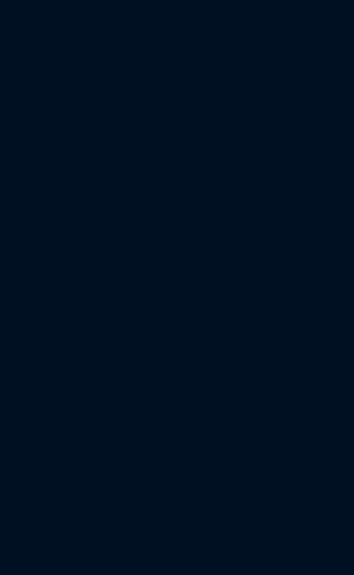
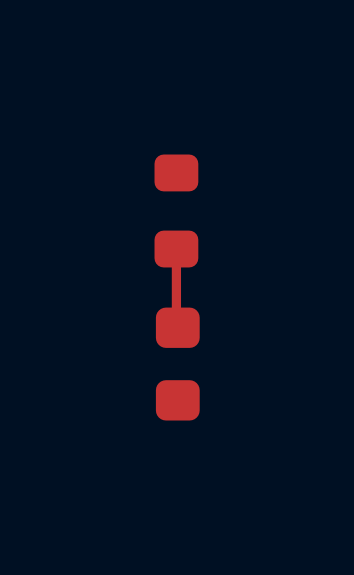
part: none -> (176, 210)
top track: none -> (176, 249) (177, 327)
part: none -> (177, 364)

